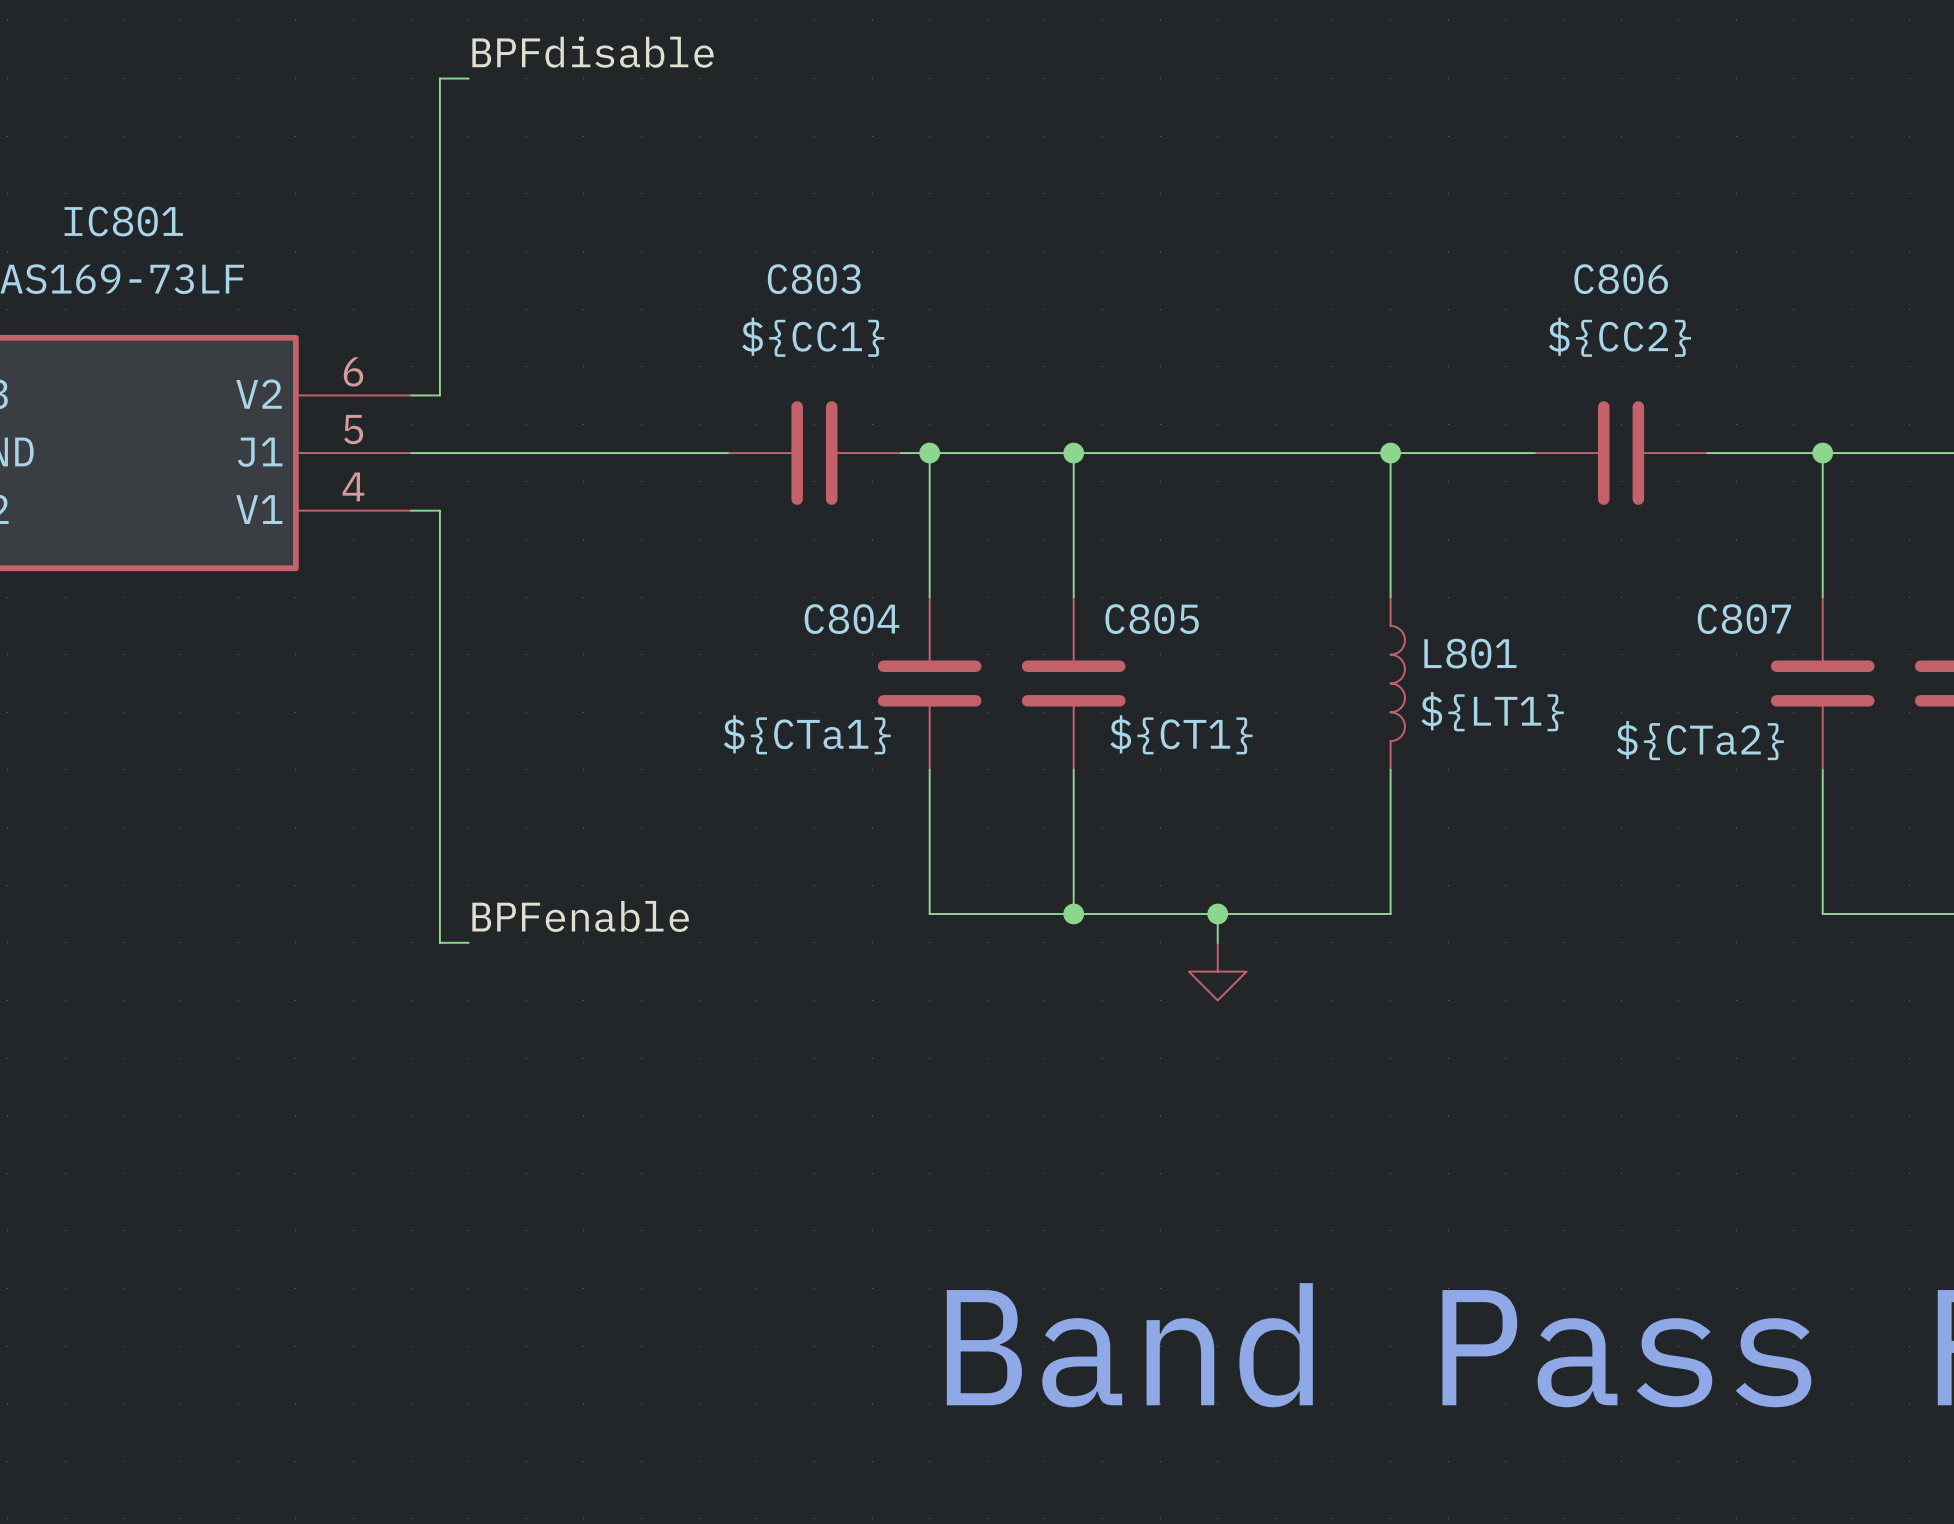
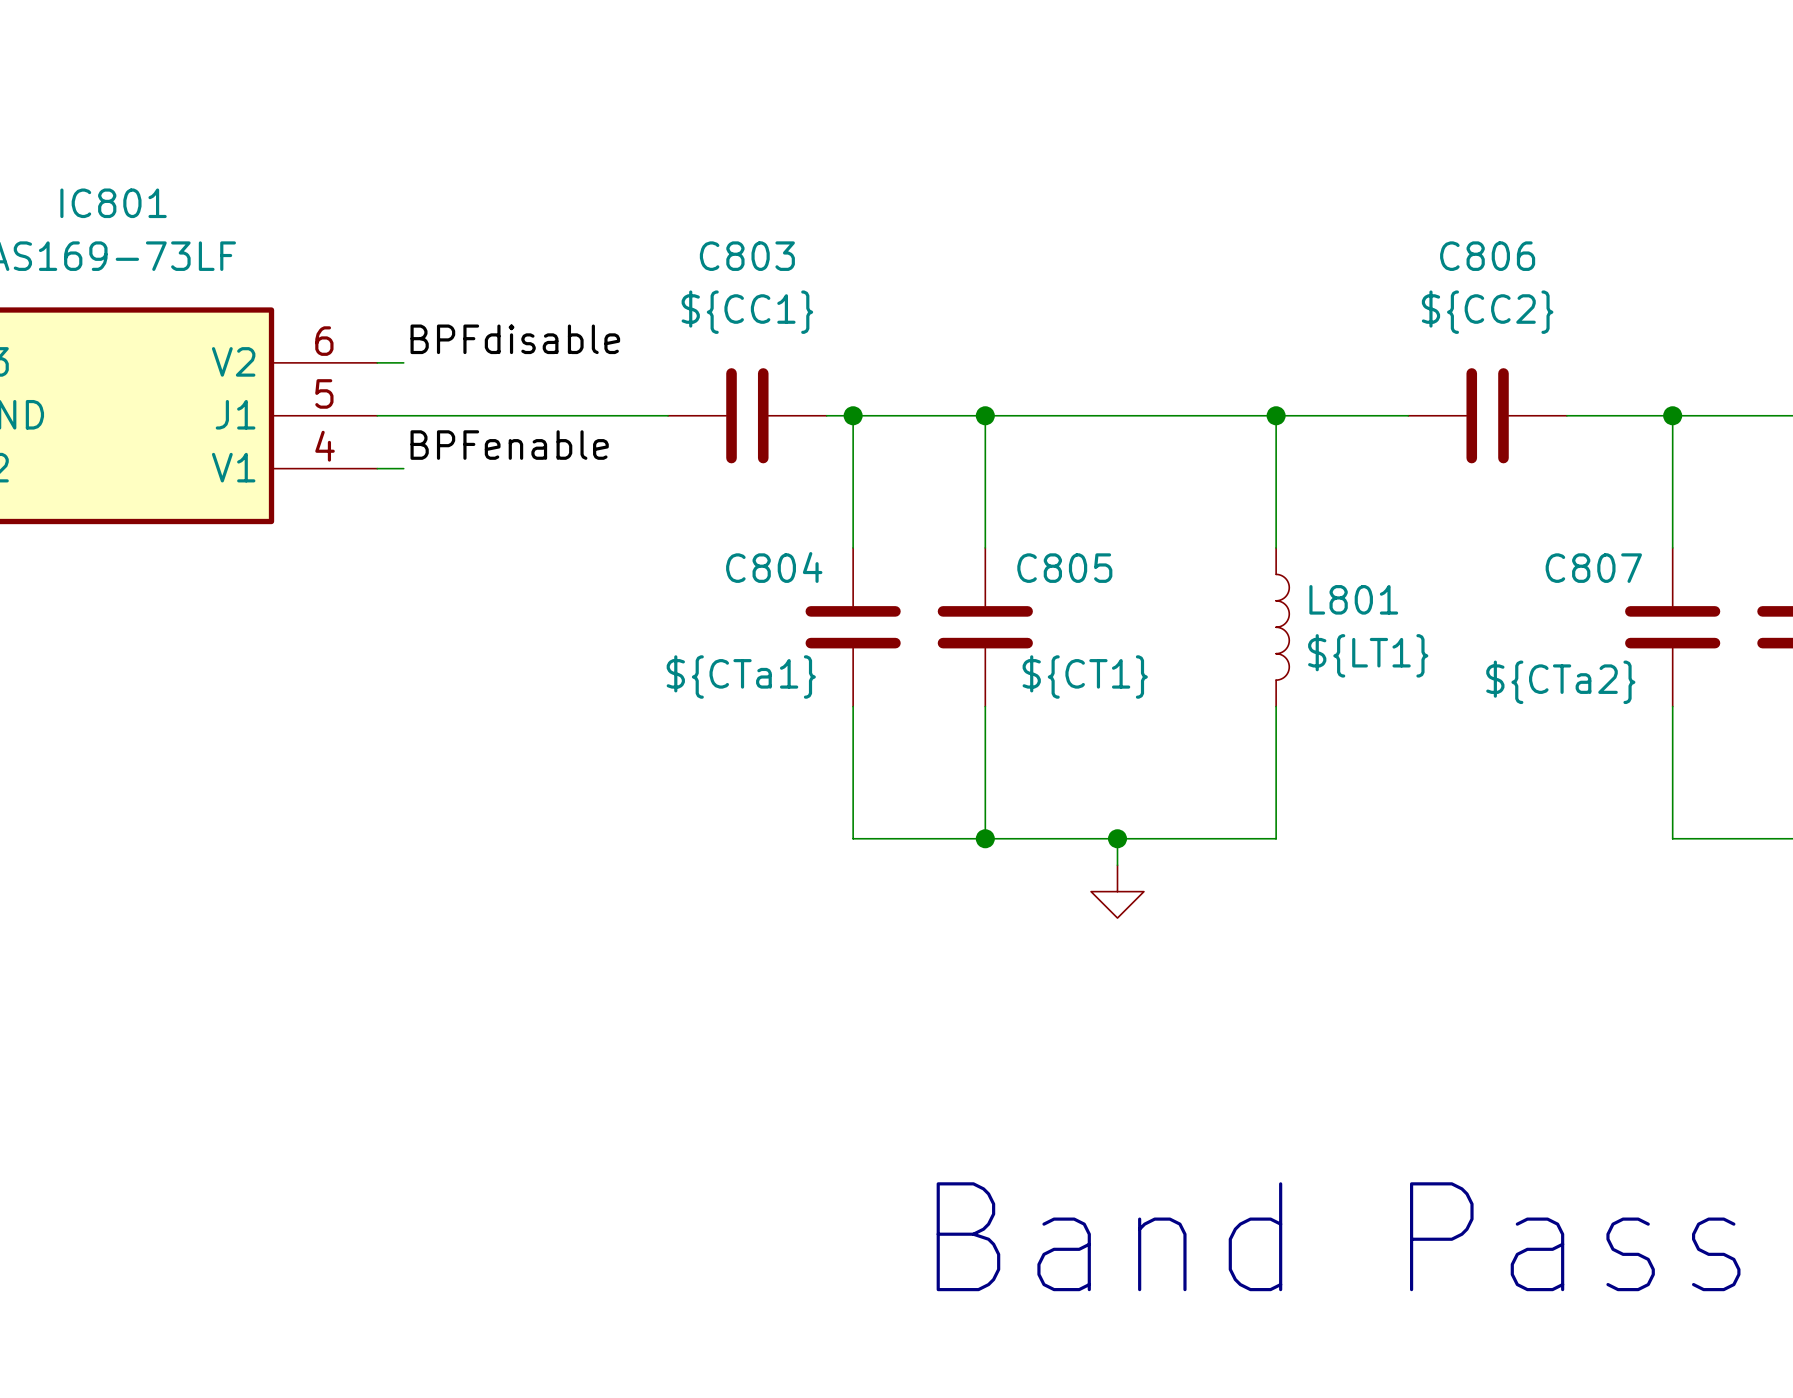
label position: BPFdisable (592, 52) -> BPFdisable (515, 339)
wire: (468, 78) (439, 78) (439, 395) -> none
wire: (439, 510) (439, 942) (468, 942) -> none
label position: BPFenable (580, 916) -> BPFenable (509, 445)

